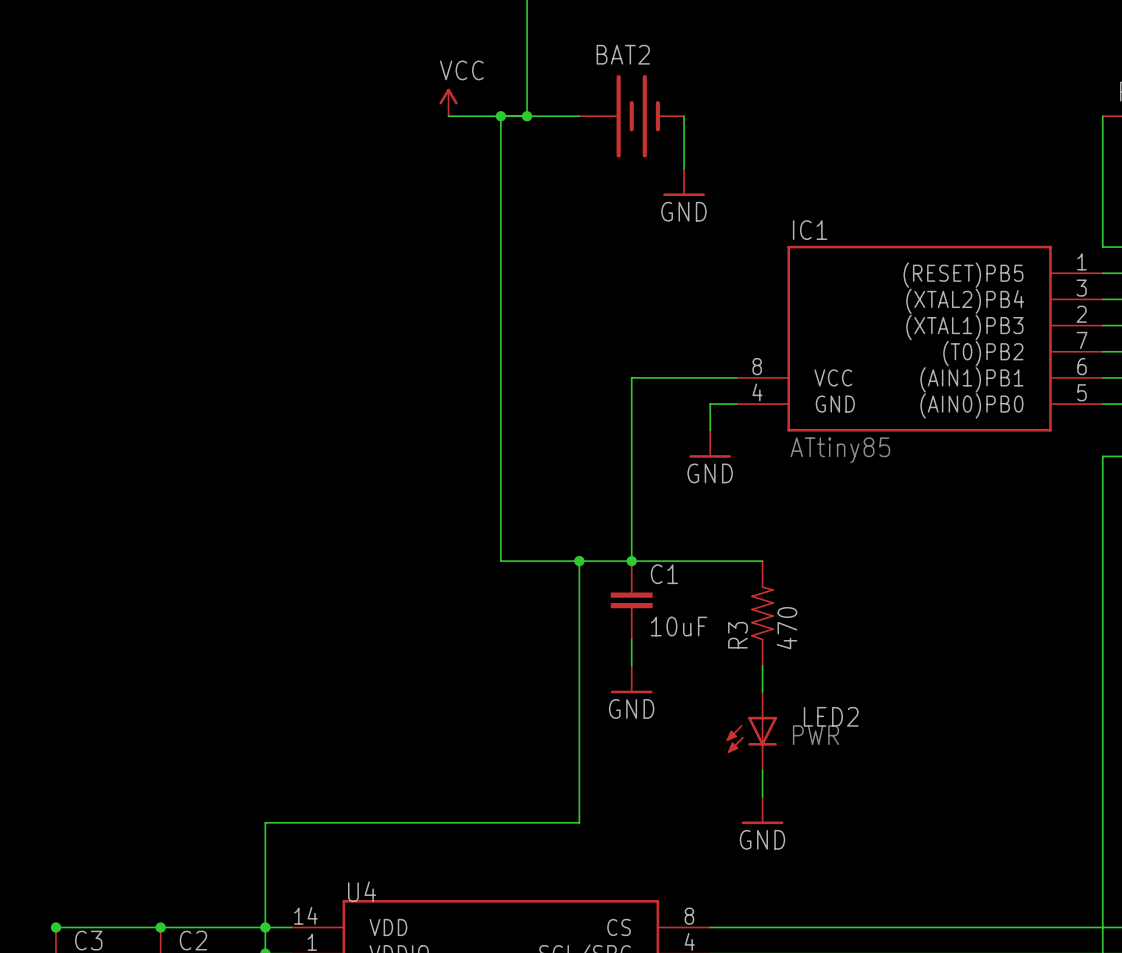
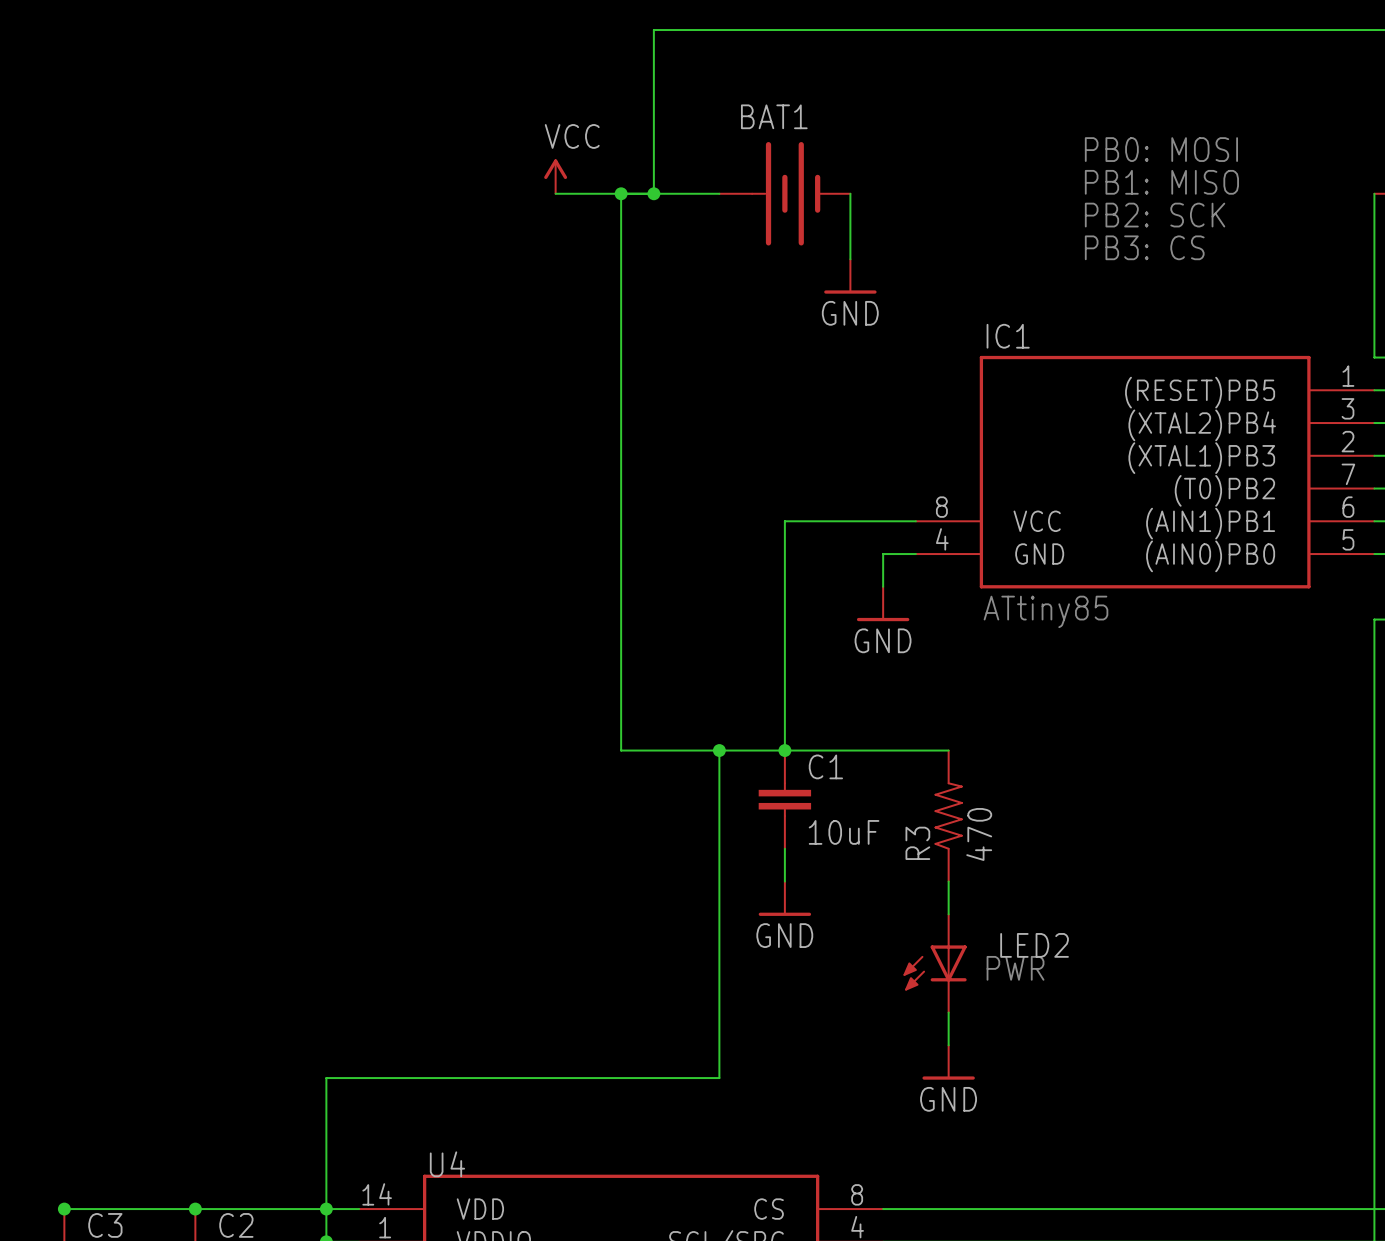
BAT2 name: BAT2 (623, 54) -> BAT1 (774, 116)
text: none -> PB0: MOSI (1161, 149)
text: none -> PB1: MISO (1161, 182)
text: none -> PB2: SCK (1155, 215)
text: none -> PB3: CS (1144, 247)

